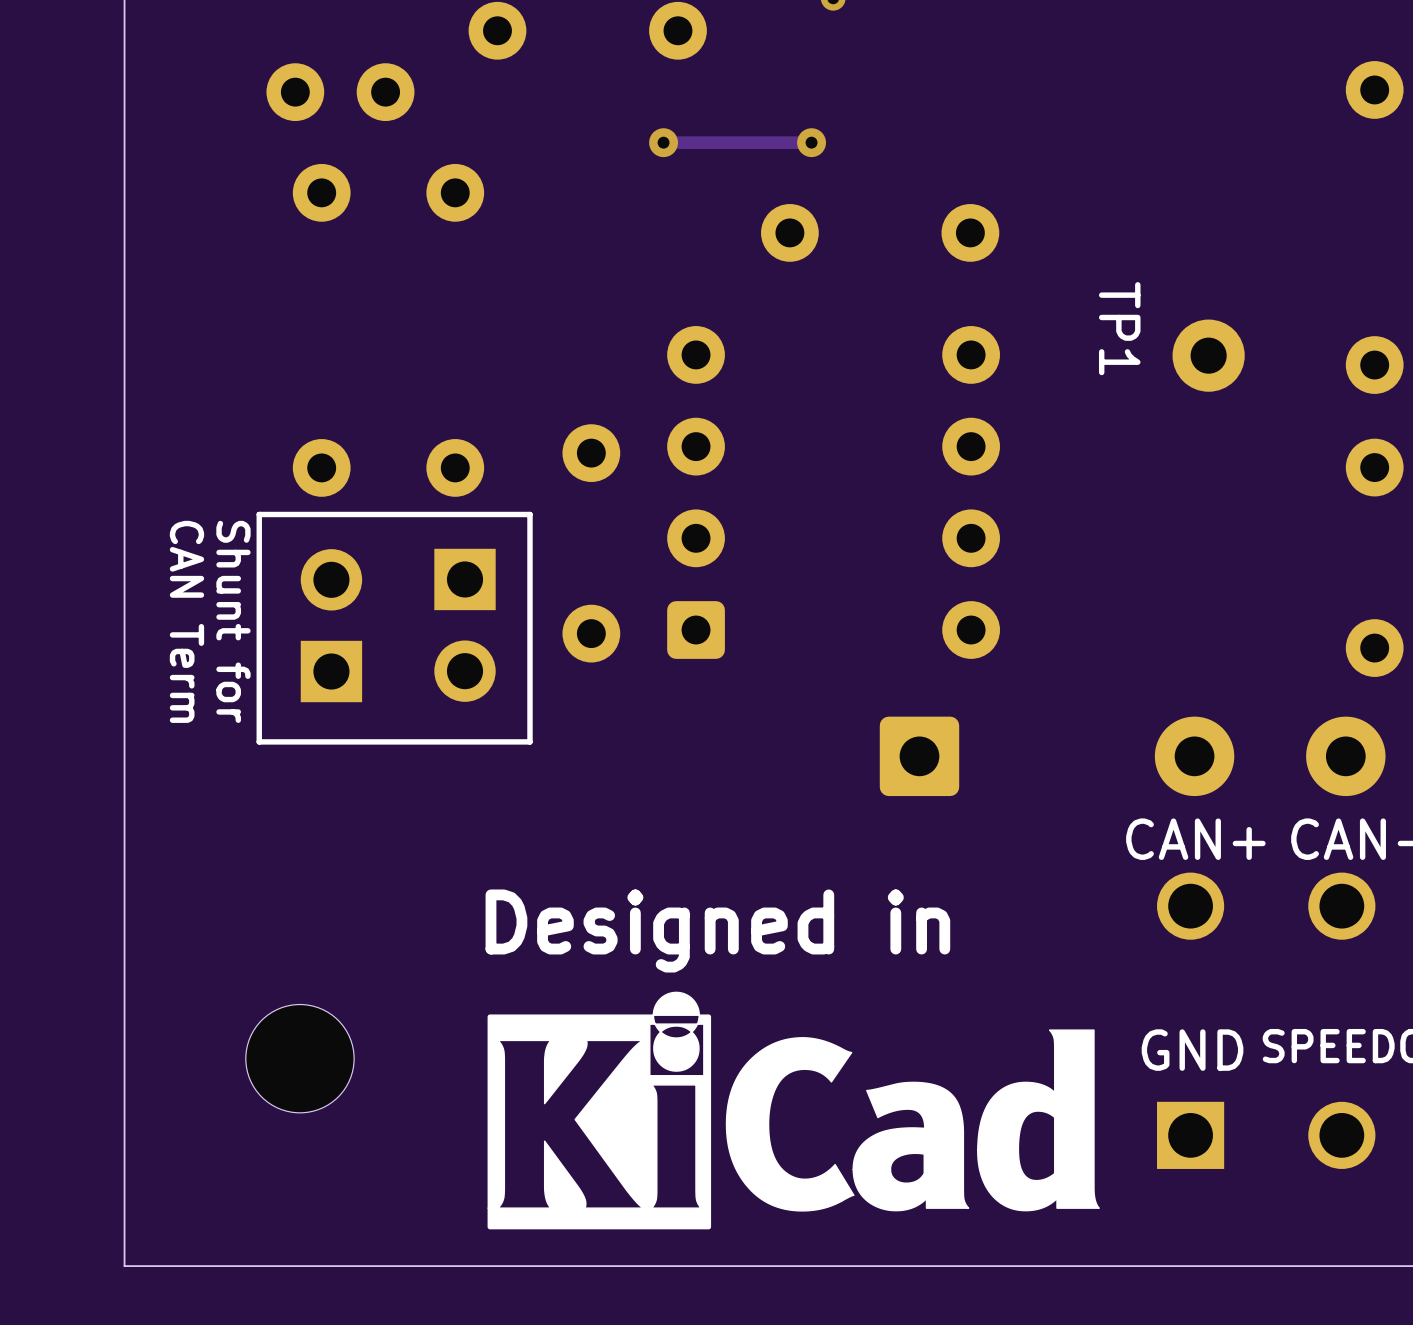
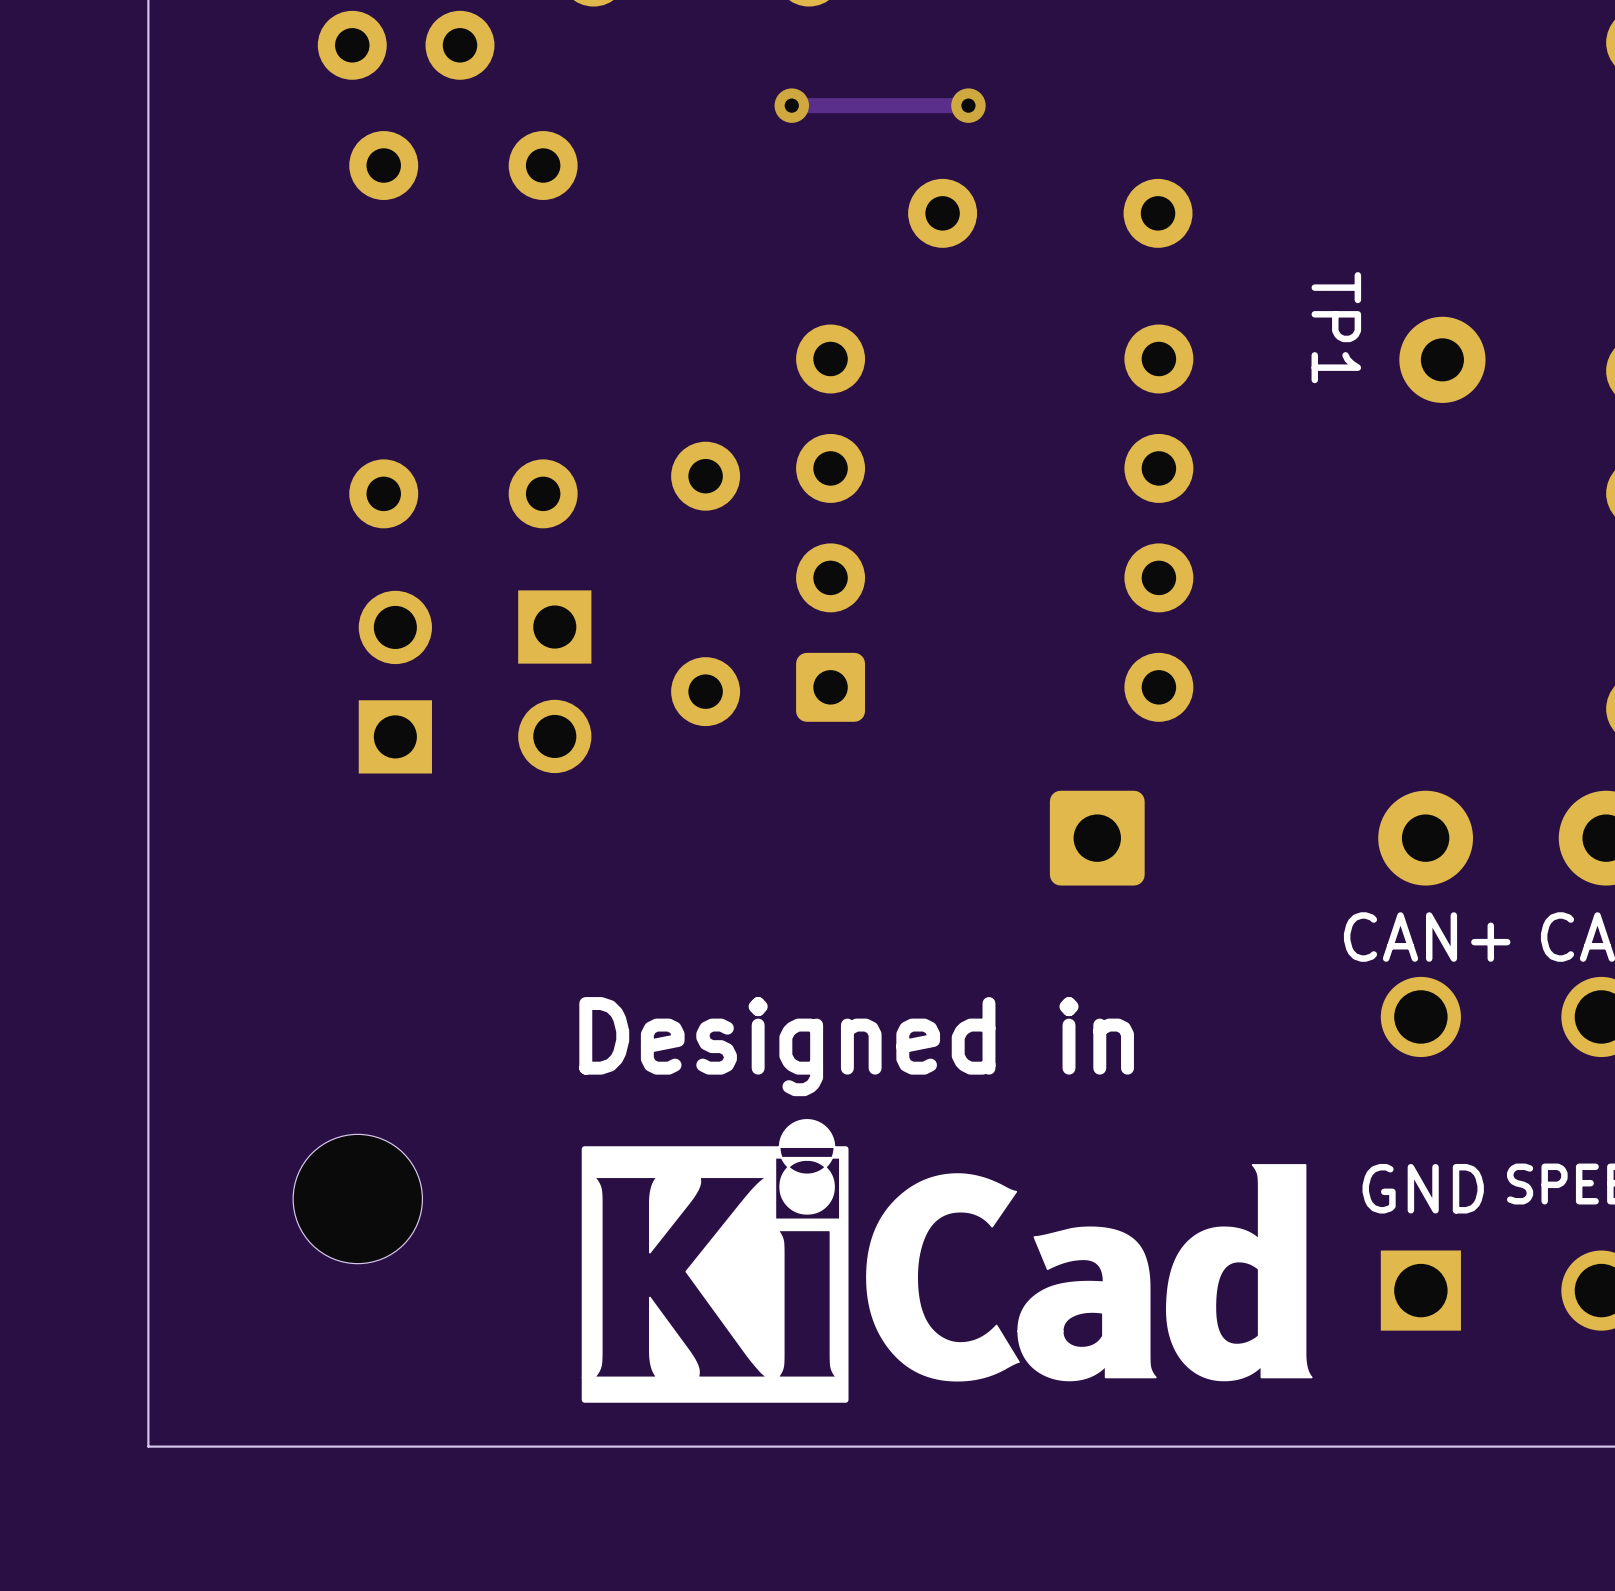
line: (529, 514) (259, 514) (259, 741) (529, 741) (529, 514) -> none
text: CAN Term (186, 621) -> none
text: Shunt for (233, 621) -> none

